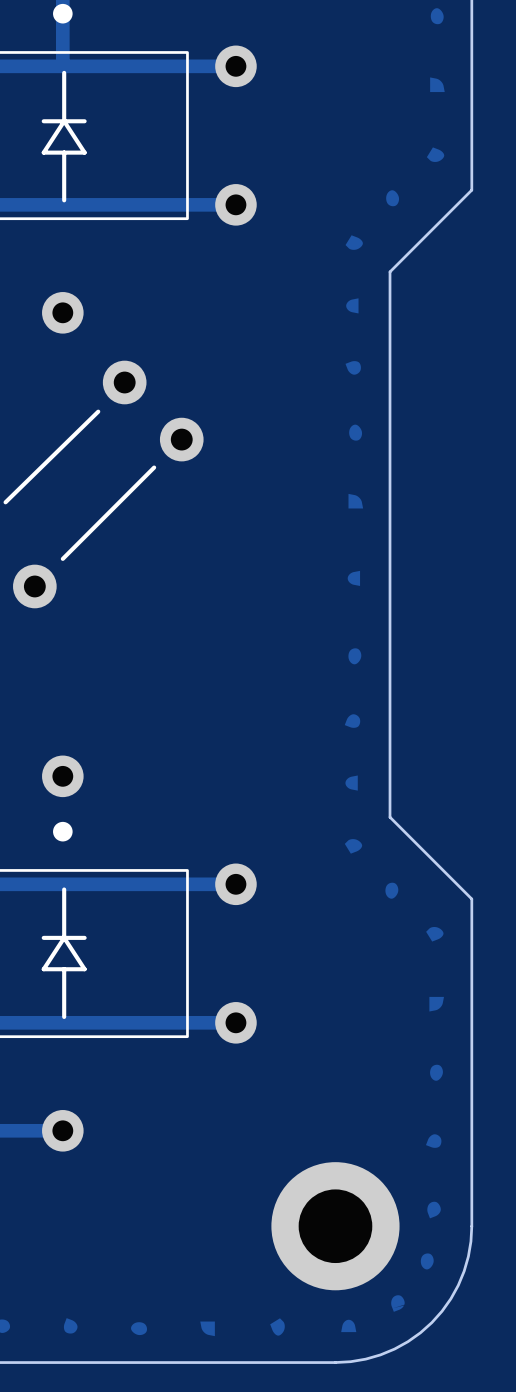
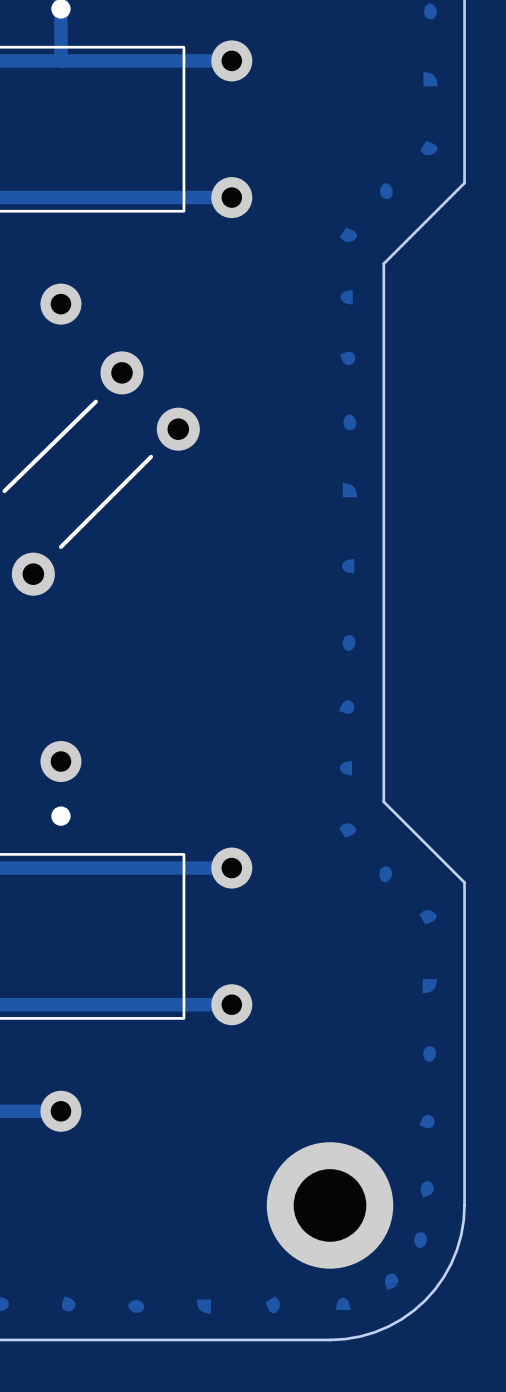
line: (64, 72) (64, 121) -> none
line: (43, 121) (84, 121) -> none
line: (64, 121) (43, 152) (84, 152) (64, 121) -> none
line: (64, 152) (64, 200) -> none
line: (64, 889) (64, 937) -> none
line: (43, 937) (84, 937) -> none
line: (64, 937) (43, 969) (84, 969) (64, 937) -> none
line: (64, 969) (64, 1016) -> none

